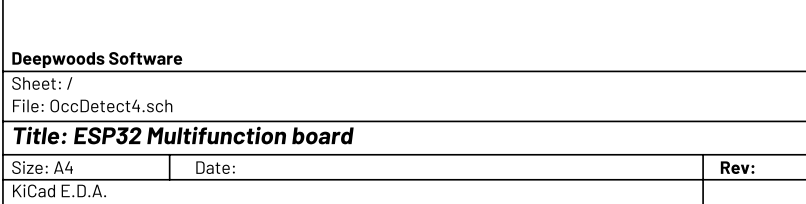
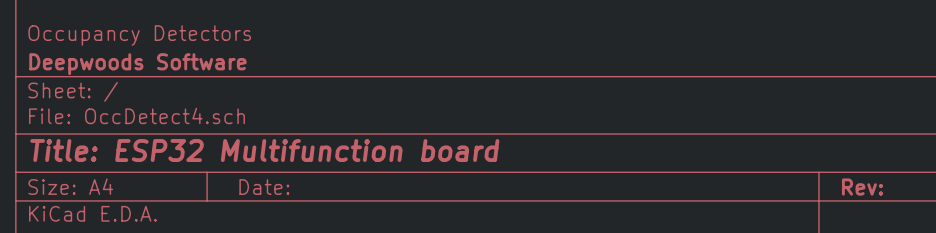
title block: none -> Occupancy Detectors (139, 35)

